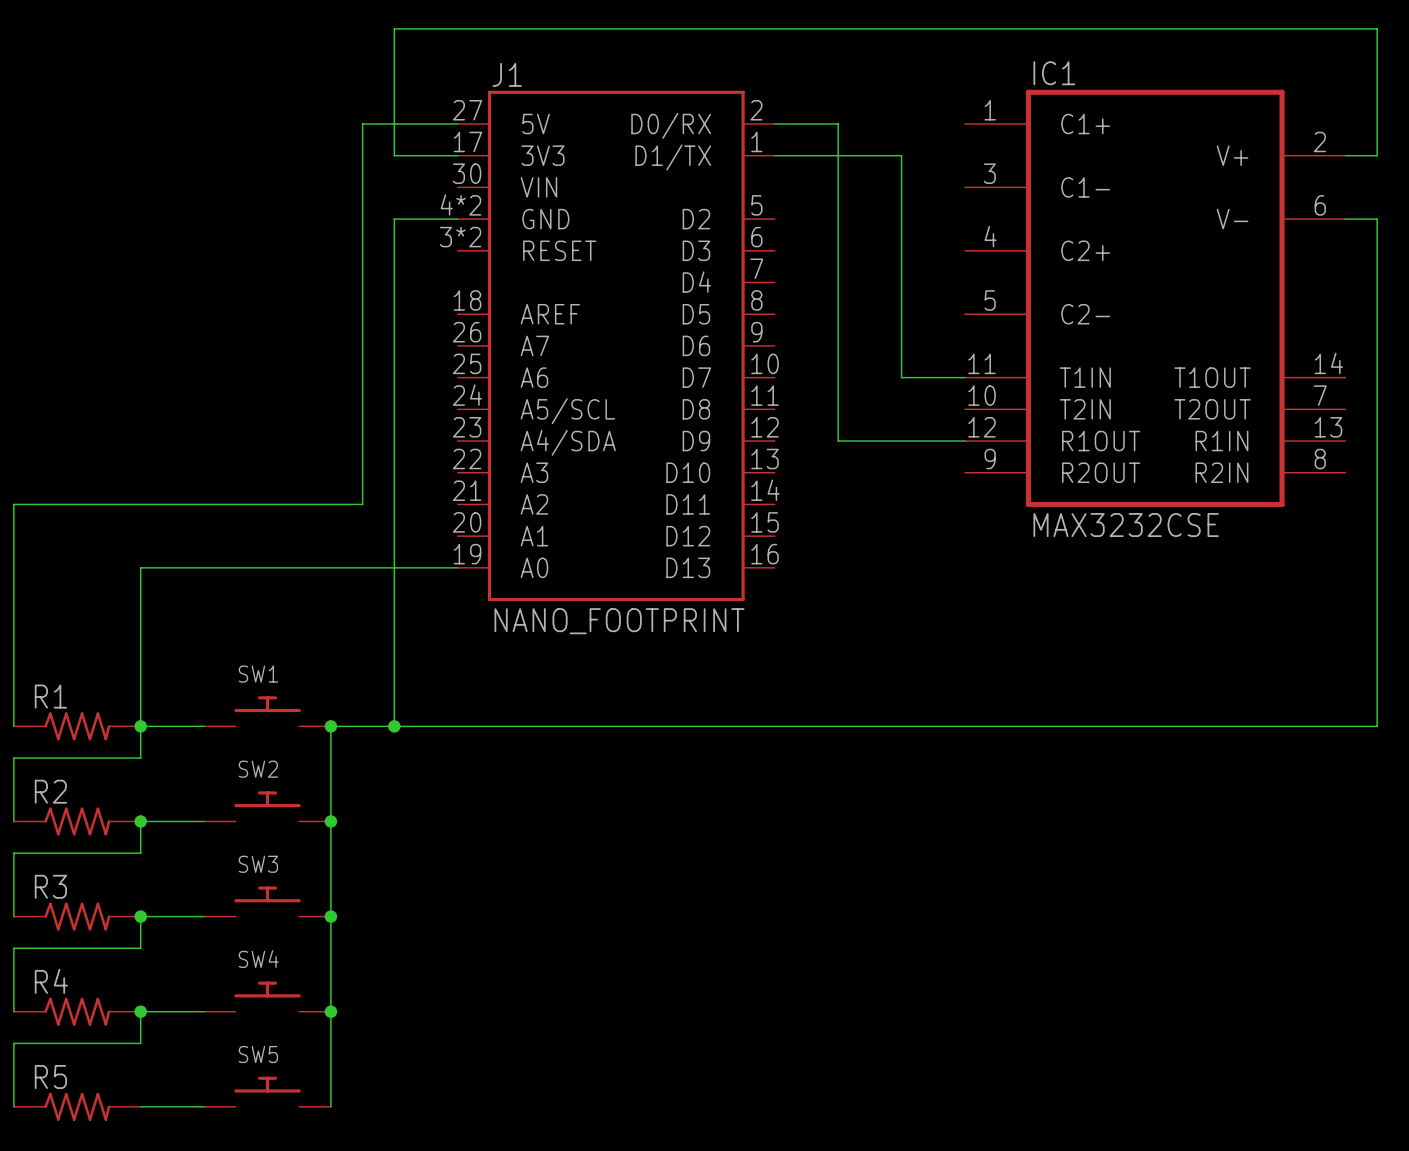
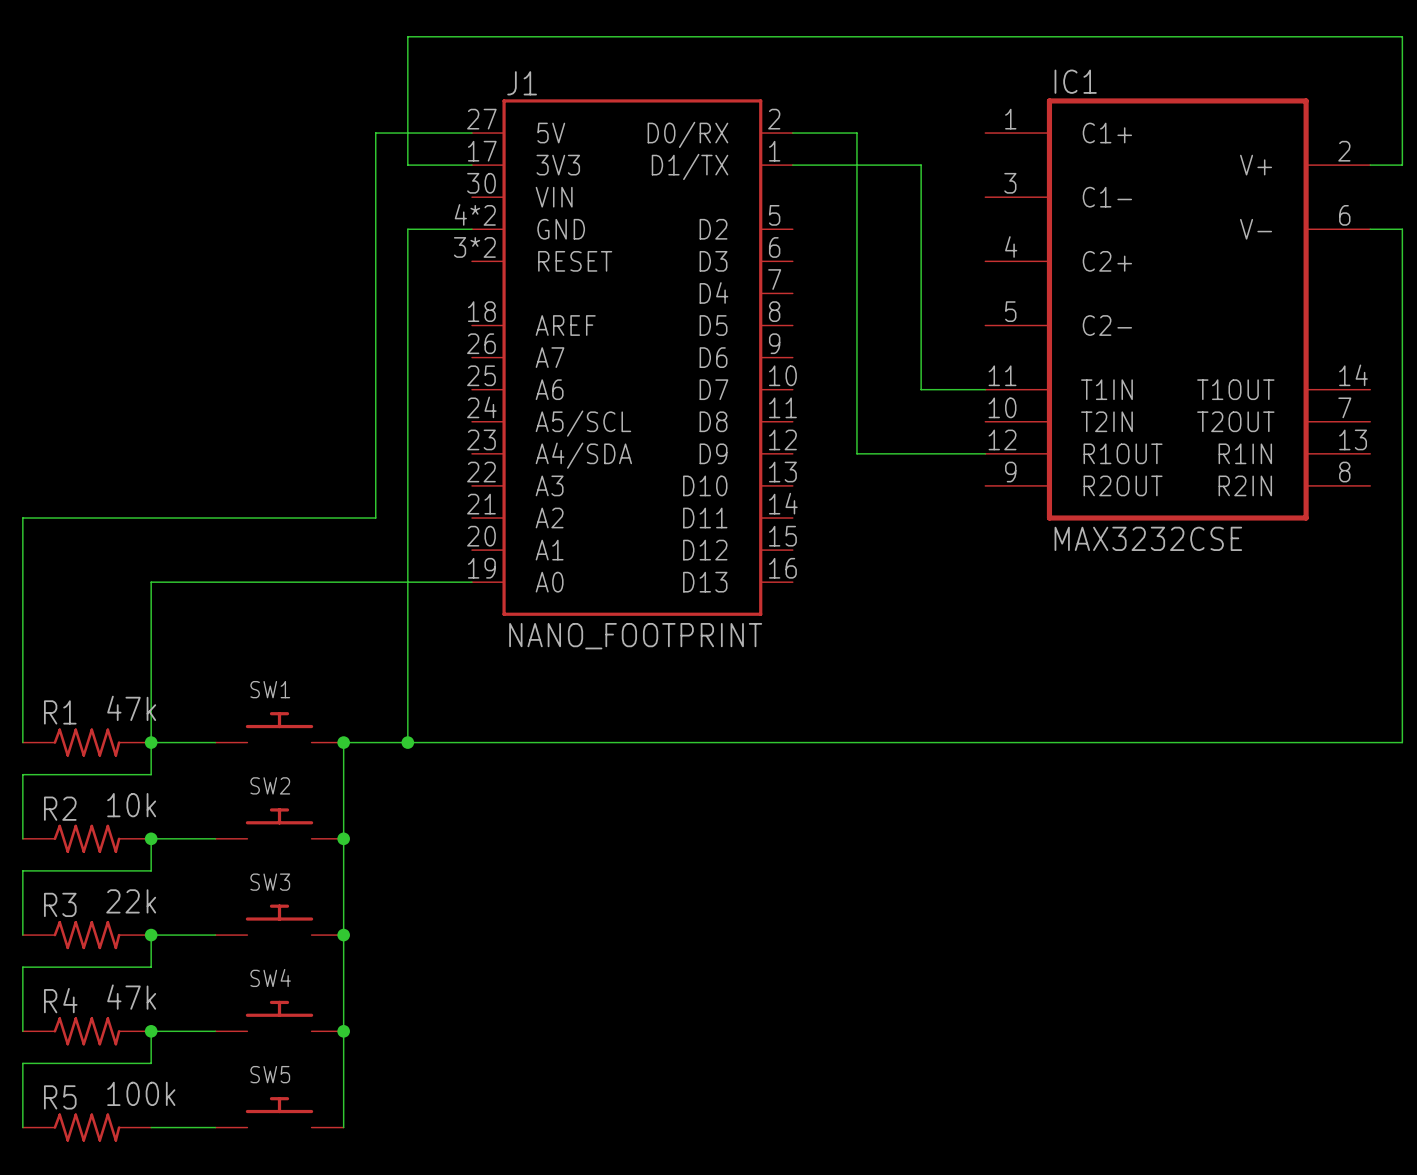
R1 value: none -> 47k (131, 708)
R2 value: none -> 10k (131, 805)
R3 value: none -> 22k (131, 901)
R4 value: none -> 47k (131, 997)
R5 value: none -> 100k (141, 1093)

